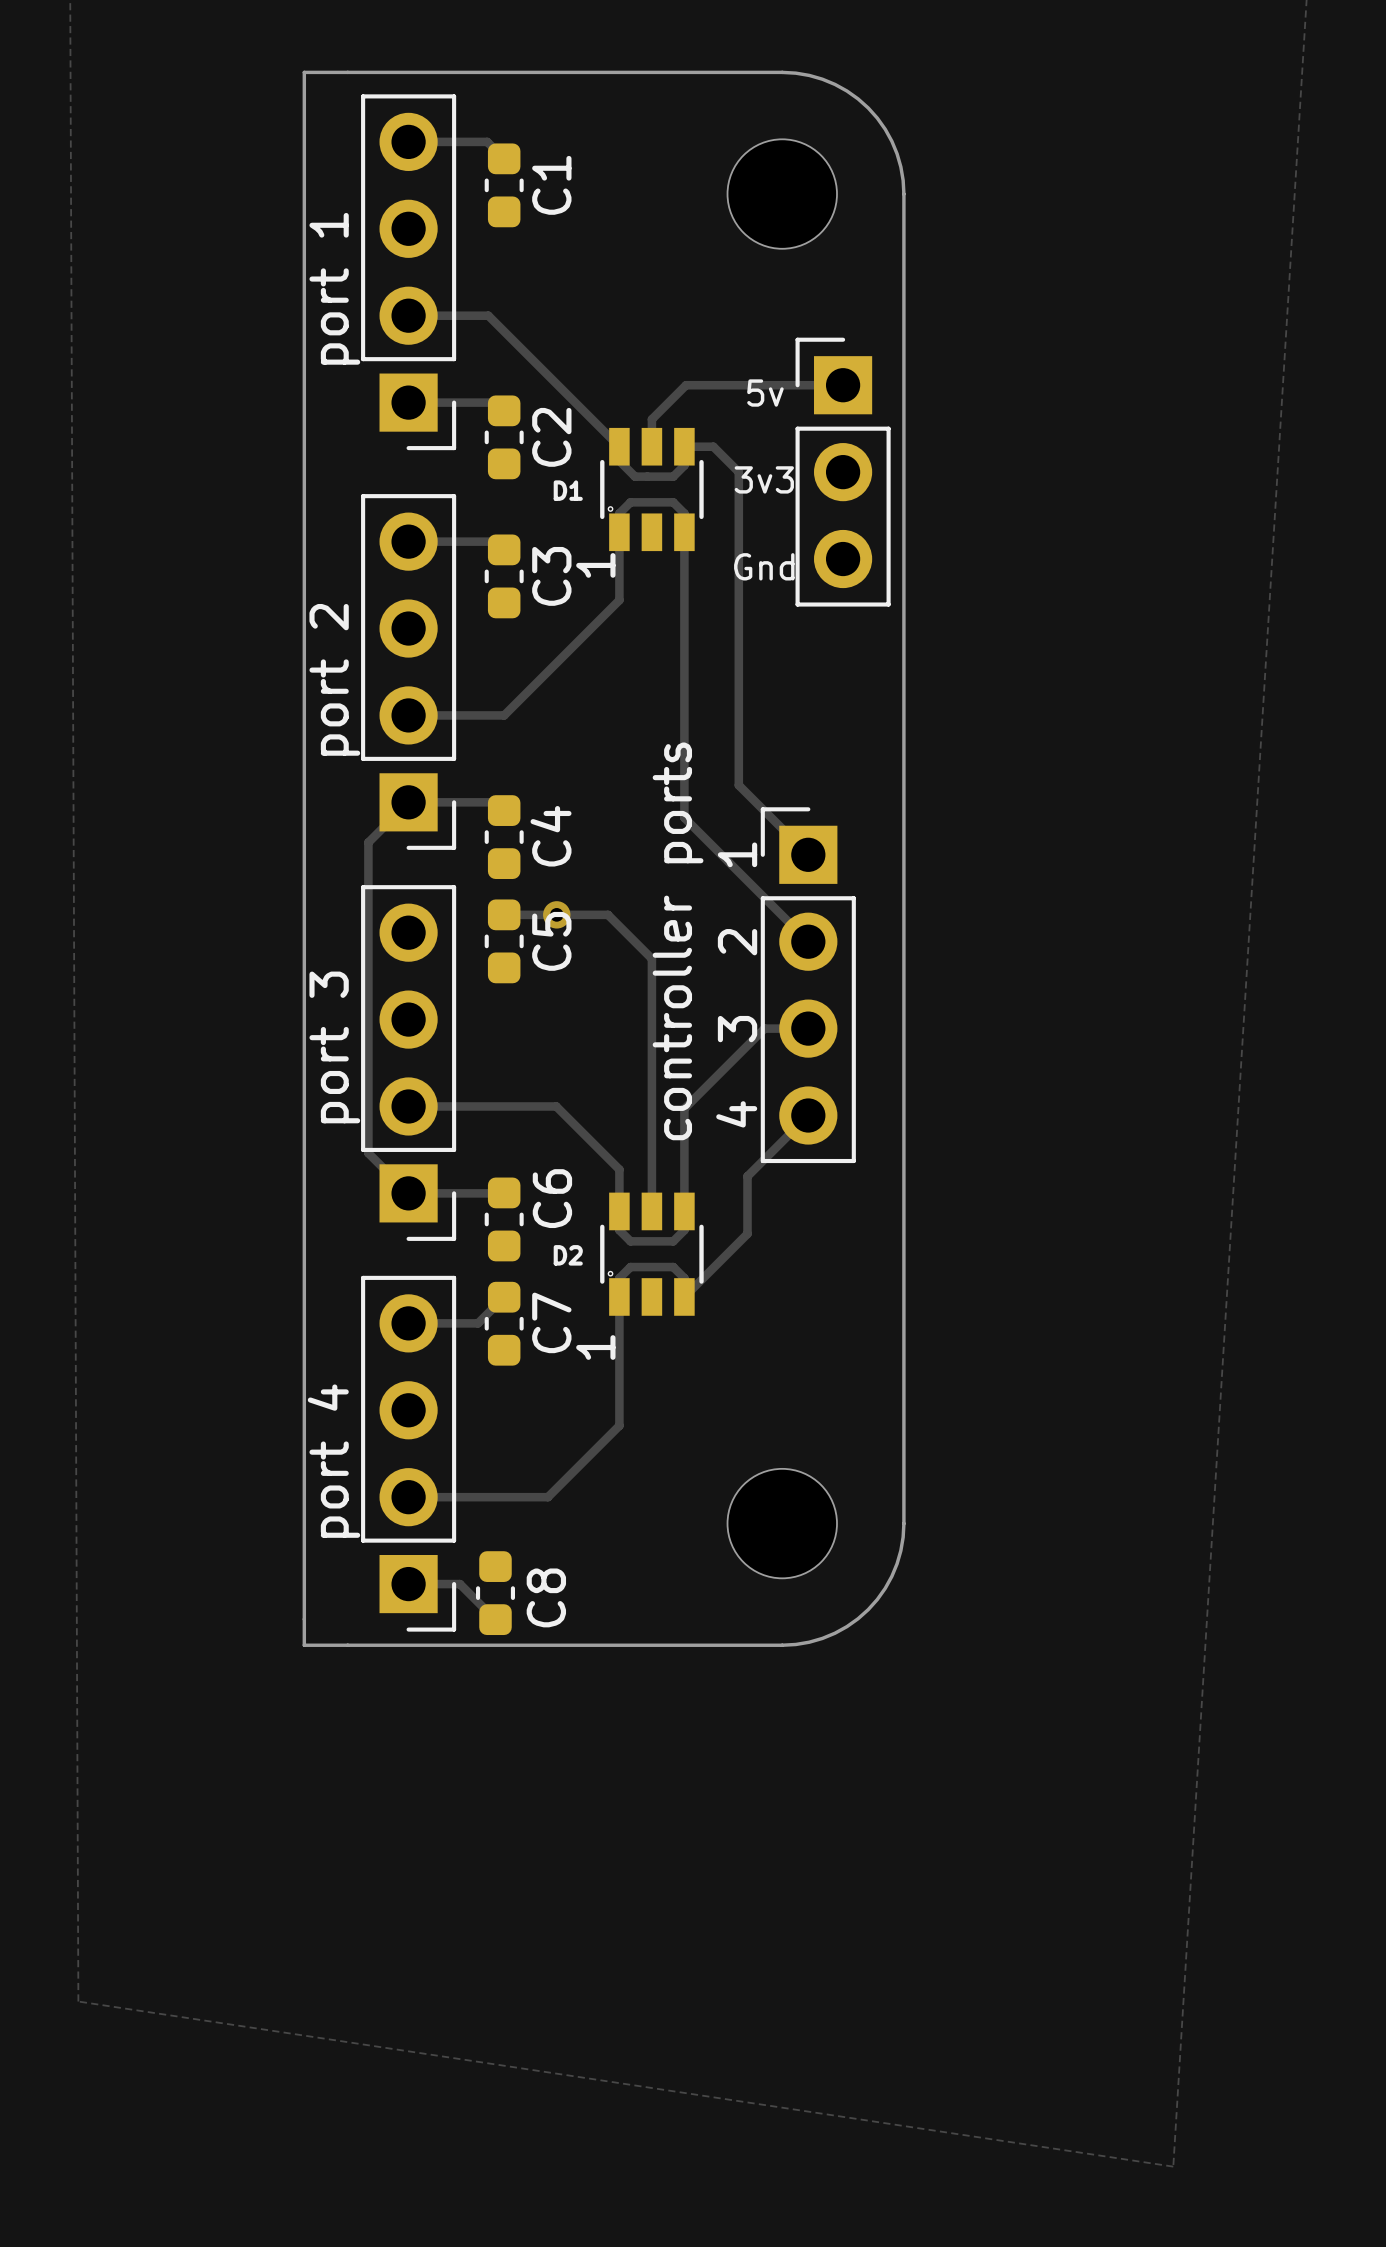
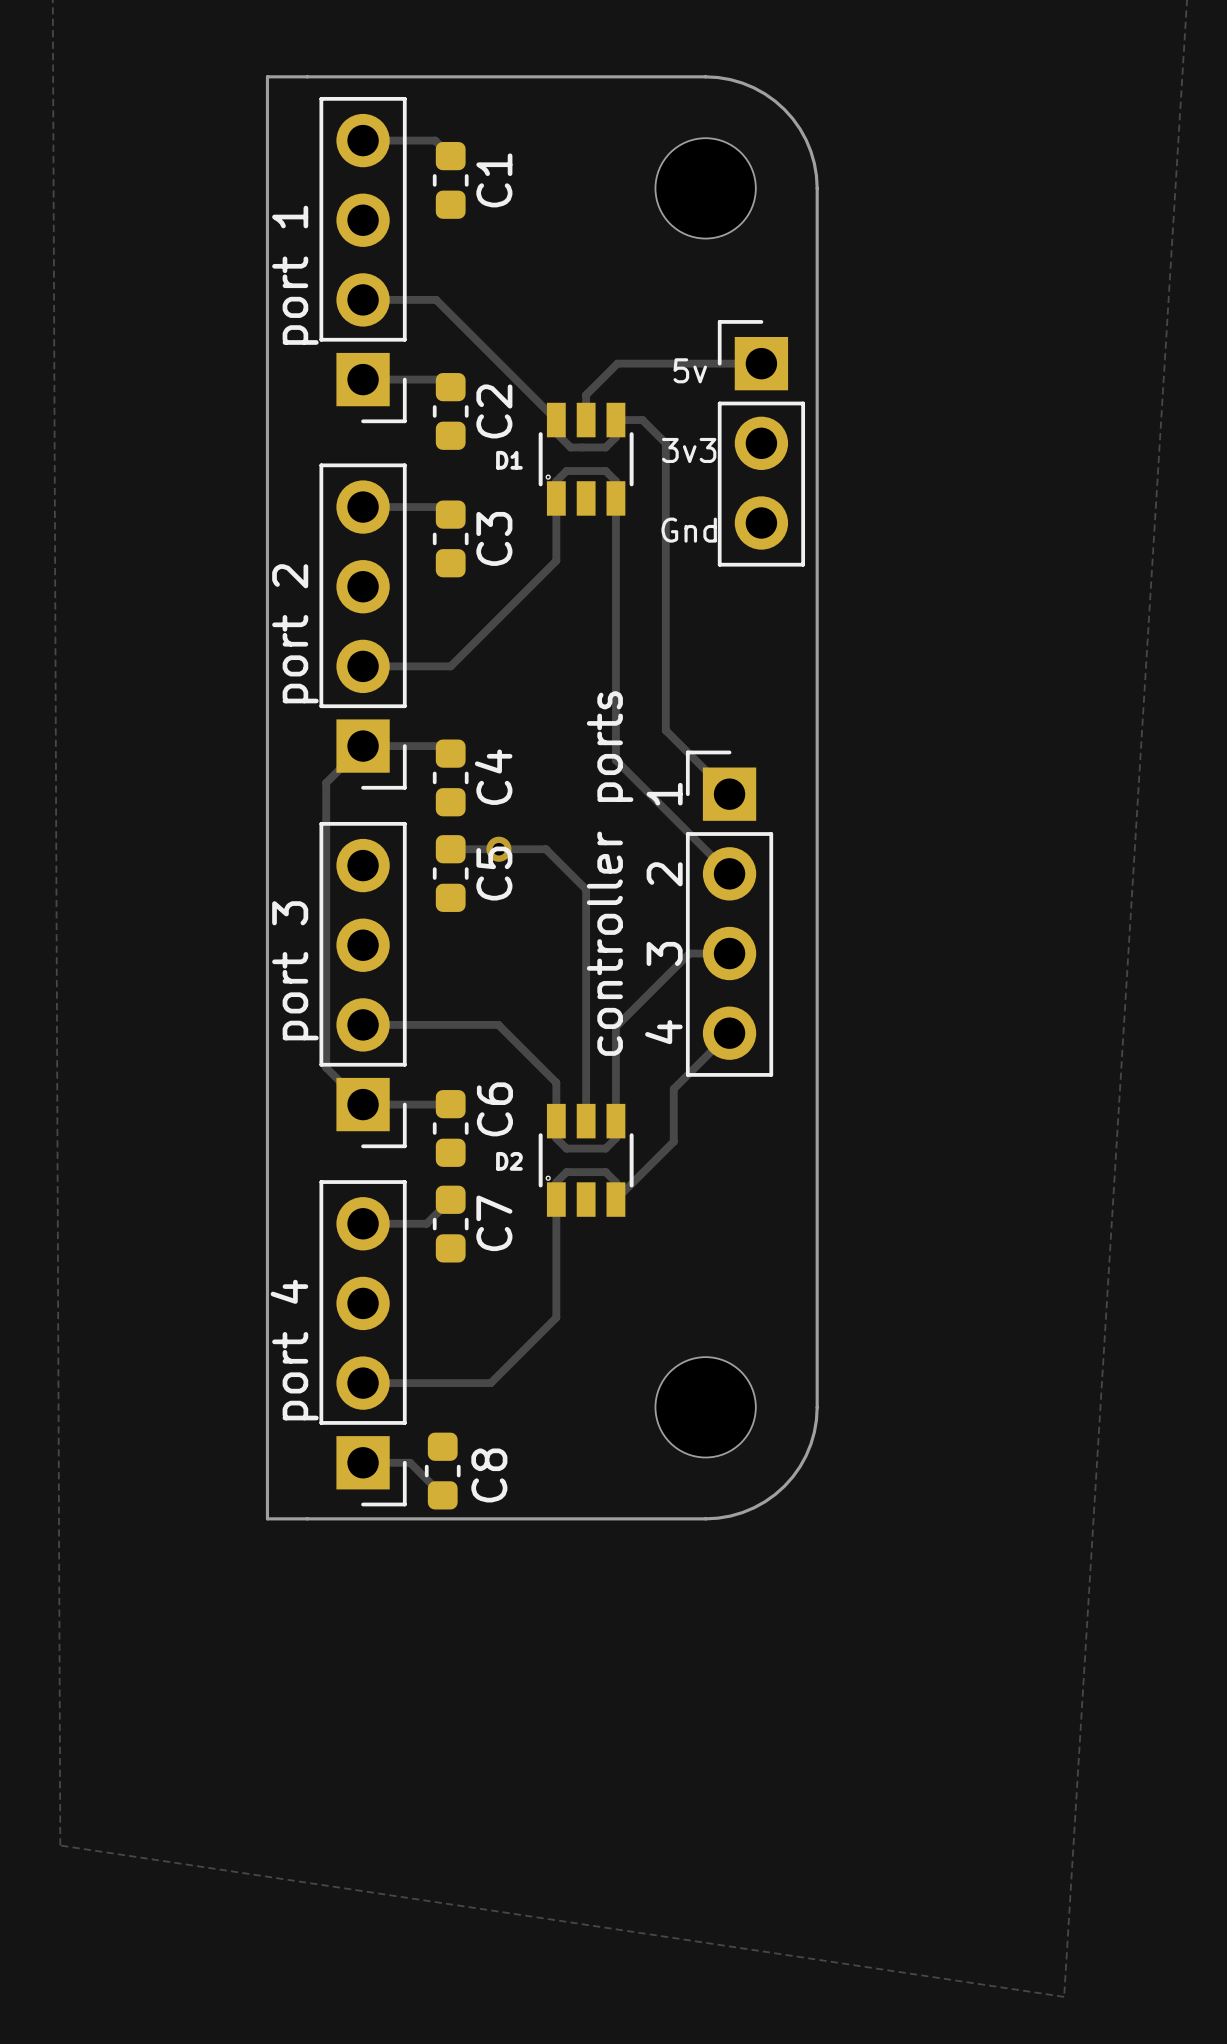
text: 1 (595, 565) -> none
text: 1 (595, 1347) -> none

